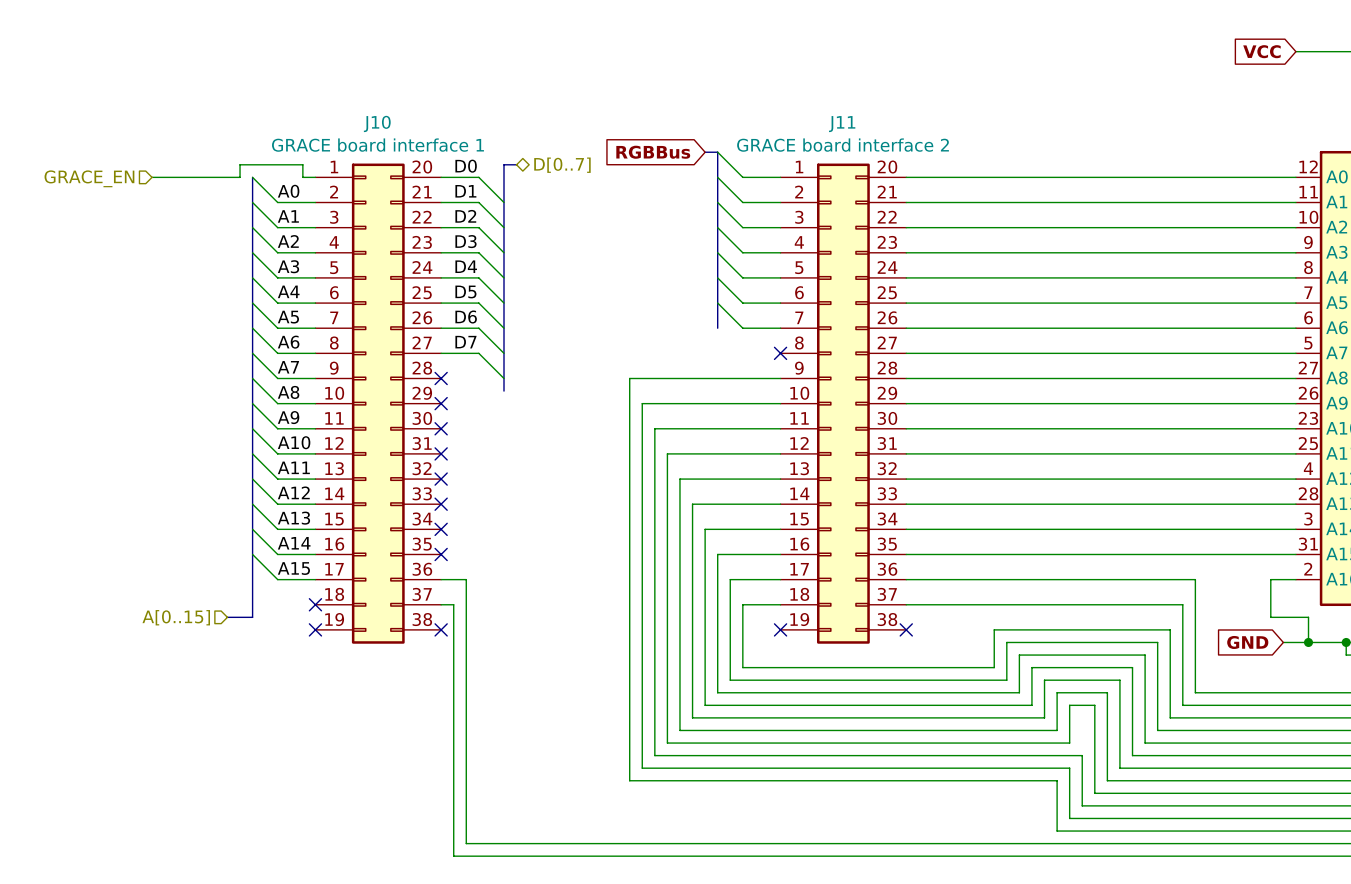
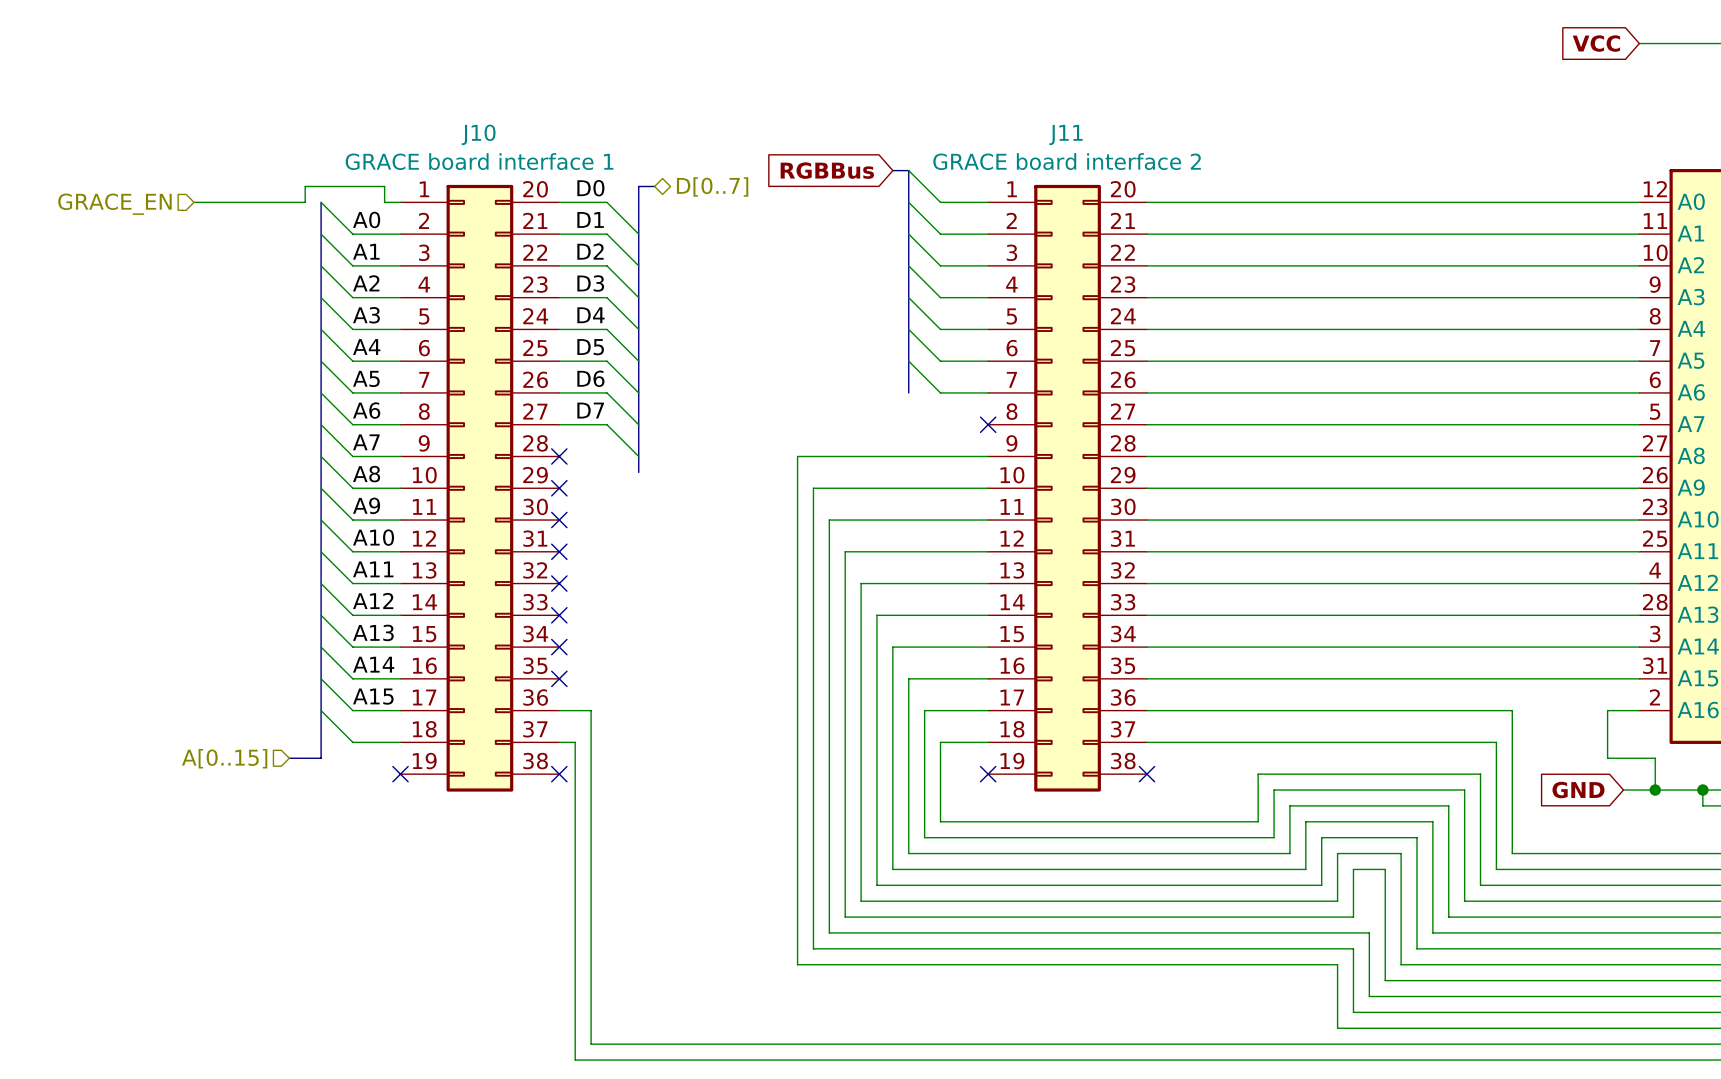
wire: none -> (321, 710) (352, 742) (400, 742)
no-connect mark: (315, 604) -> none

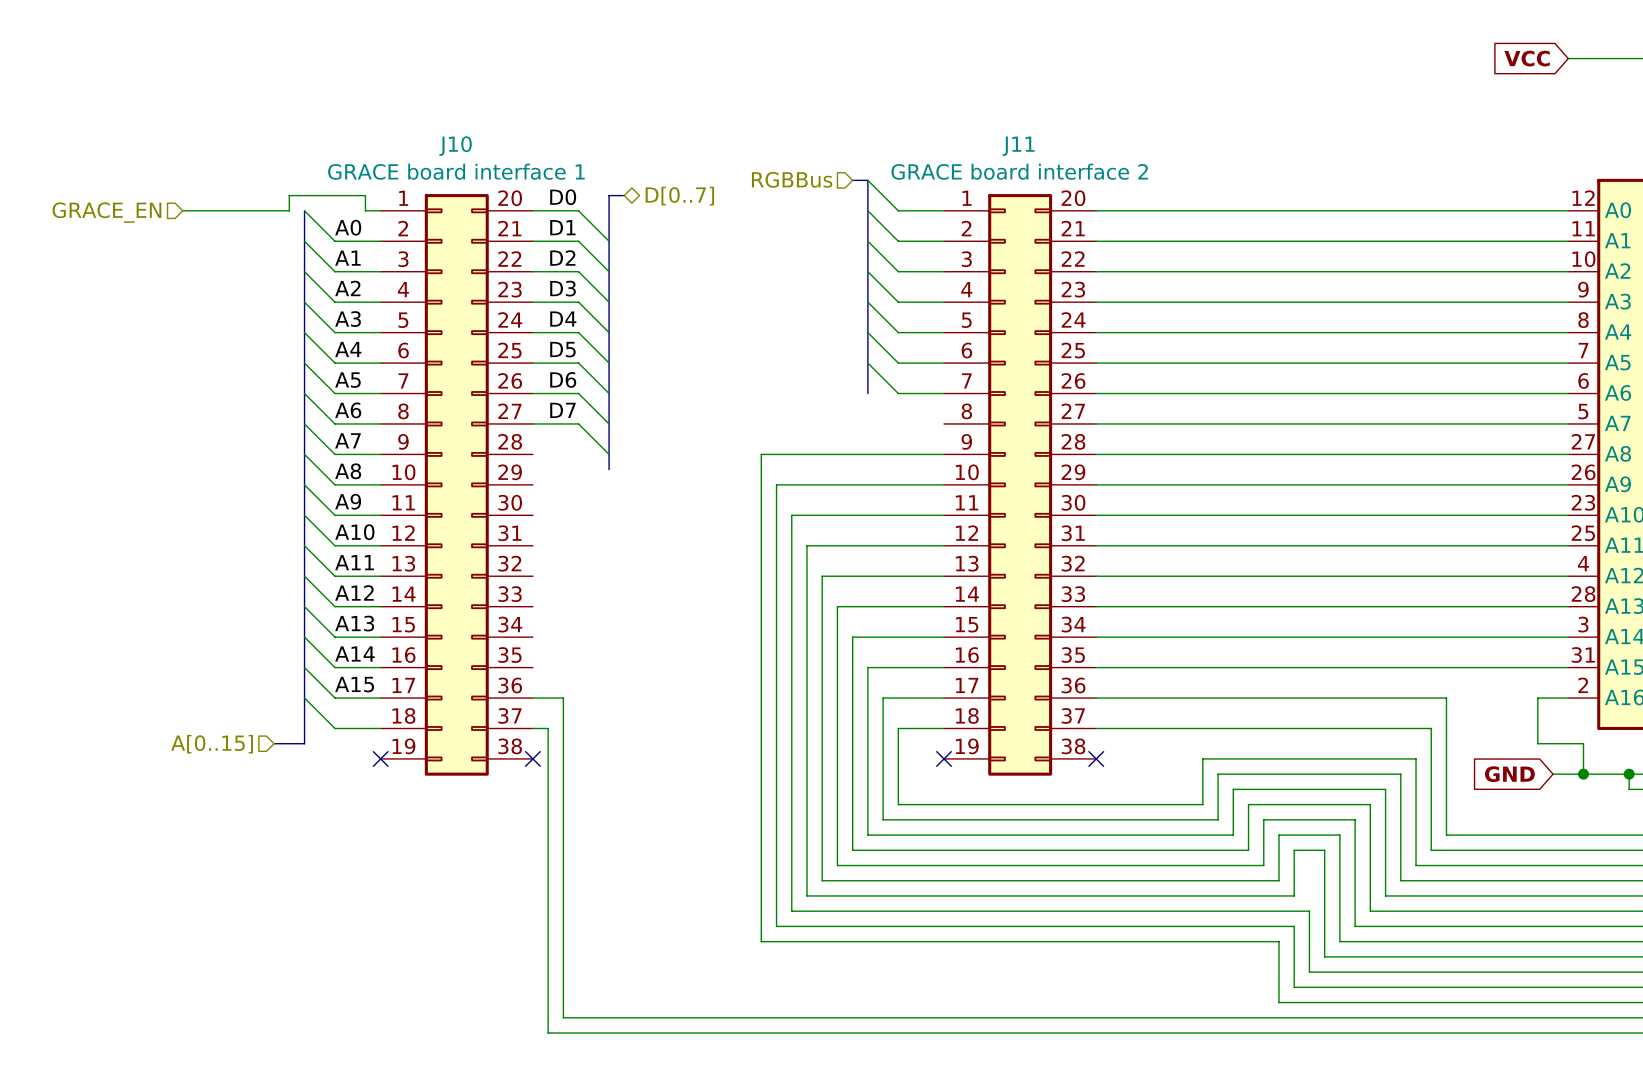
global label: RGBBus (827, 170) -> none
hierarchical label: none -> RGBBus (792, 179)
no-connect mark: (988, 424) -> none
no-connect mark: (559, 456) -> none
no-connect mark: (559, 488) -> none
no-connect mark: (559, 520) -> none
no-connect mark: (559, 551) -> none
no-connect mark: (559, 583) -> none
no-connect mark: (559, 615) -> none
no-connect mark: (559, 647) -> none
no-connect mark: (559, 678) -> none

